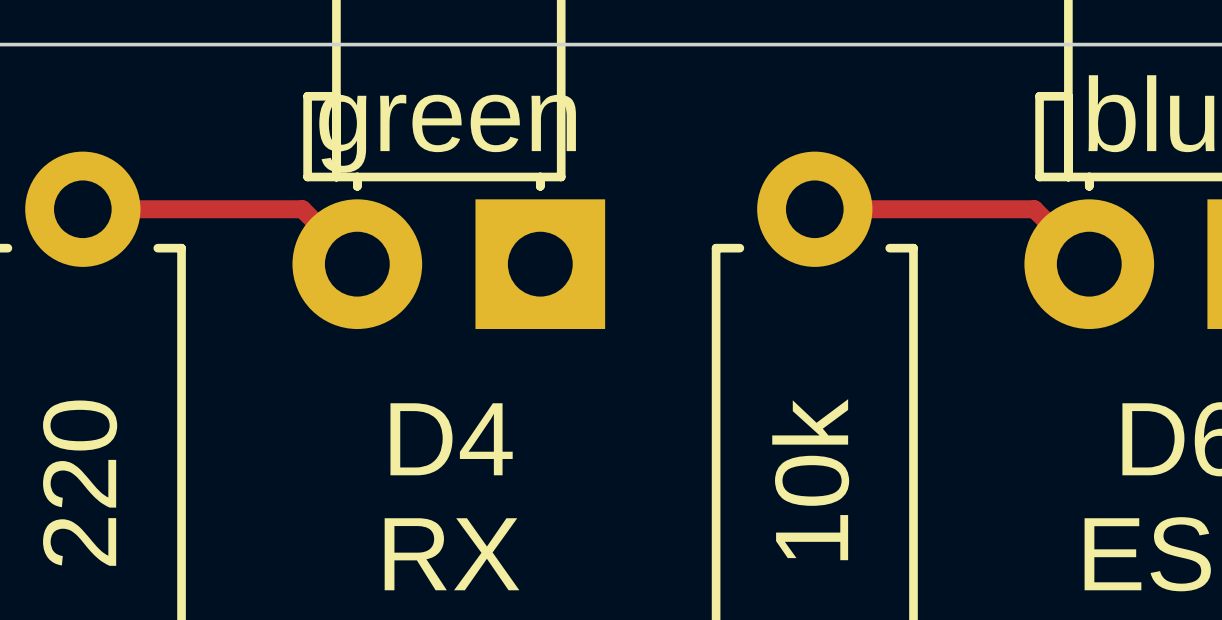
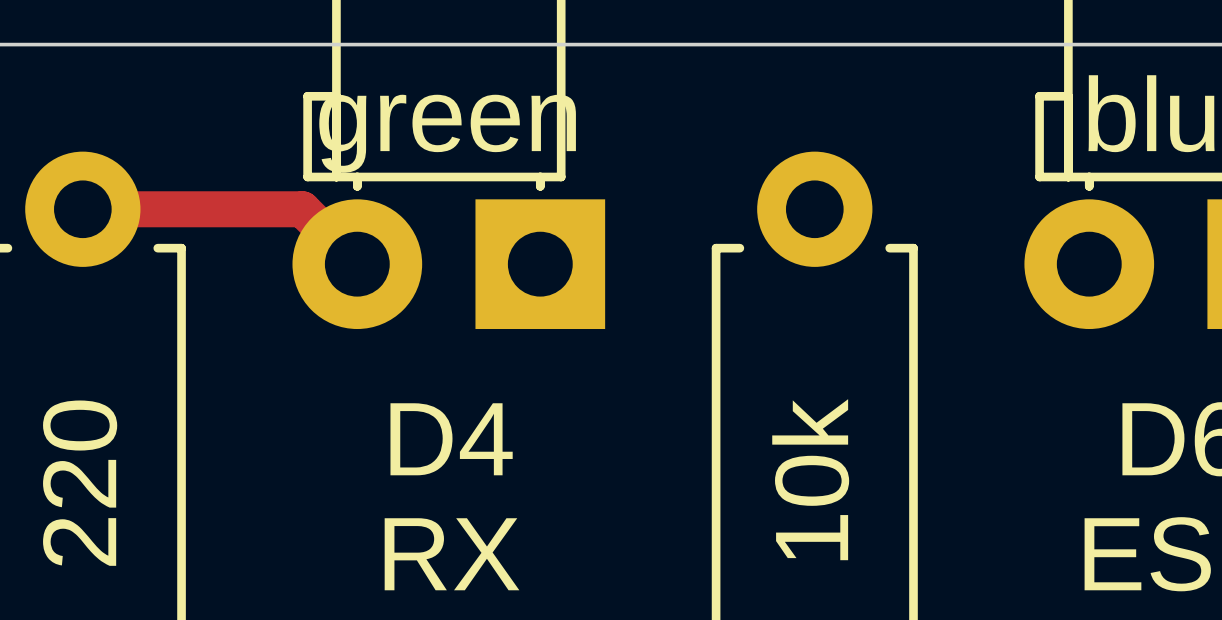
track width: thin (82, 209) (302, 209) (357, 264) -> thick (82, 209) (302, 209) (357, 264)
track: (814, 209) (1034, 209) (1089, 264) -> none

